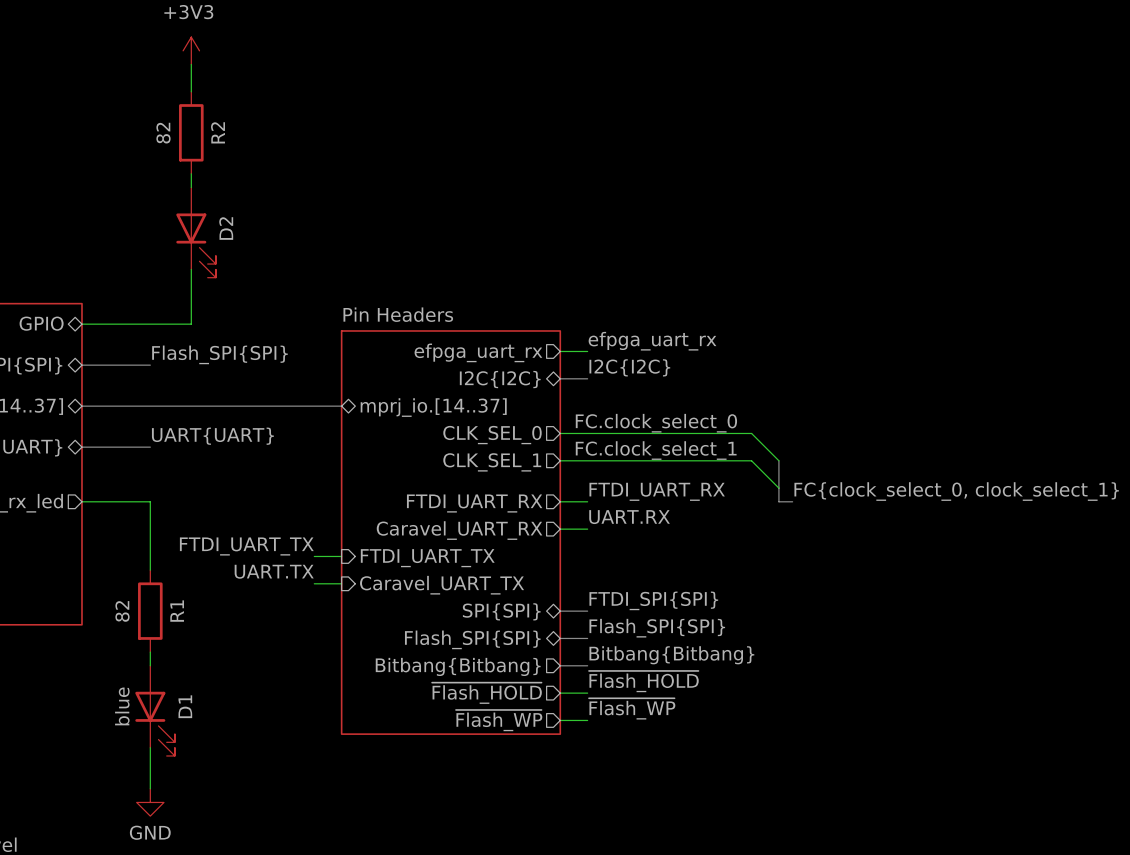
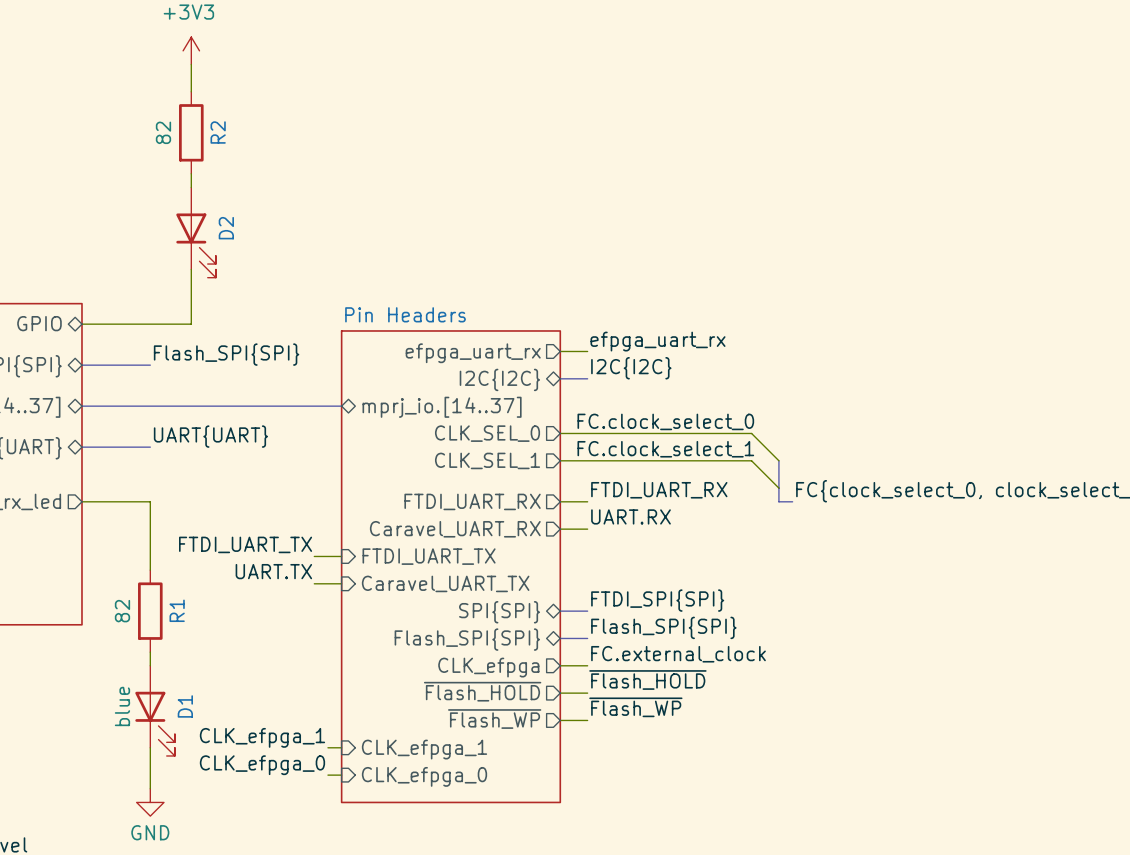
sheet Pin Headers: (450, 532) -> none
sheet Pin Headers: none -> (450, 566)
label: Bitbang{Bitbang} (671, 655) -> FC.external_clock (678, 654)
bus: (560, 665) (587, 665) -> none
sheet pin: Bitbang{Bitbang} (458, 666) -> CLK_efpga (488, 667)
label: none -> CLK_efpga_1 (262, 737)
wire: none -> (327, 747) (341, 747)
sheet pin: none -> CLK_efpga_1 (424, 749)
label: none -> CLK_efpga_0 (262, 765)
wire: none -> (327, 775) (341, 775)
sheet pin: none -> CLK_efpga_0 (424, 776)

